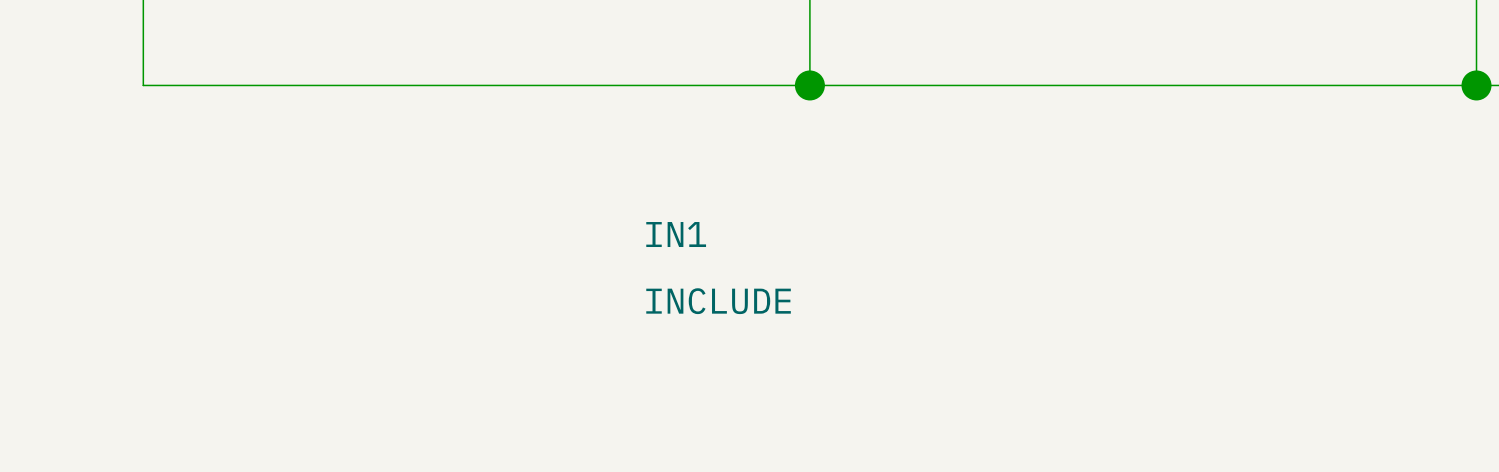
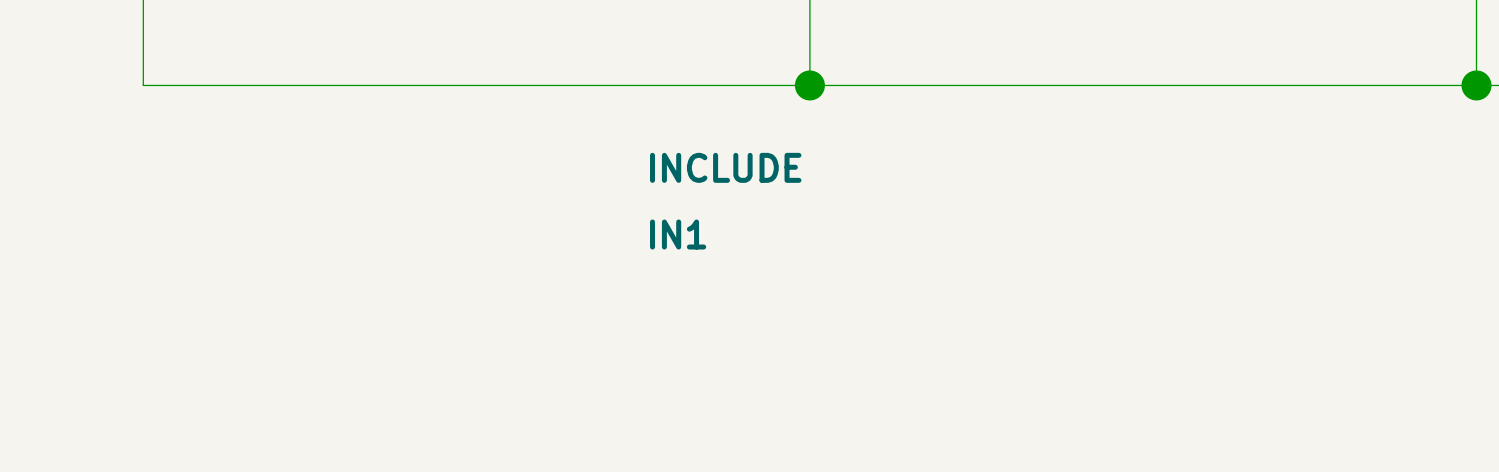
IN1 position: (718, 268) -> (725, 201)
IN1 value position: INCLUDE (718, 301) -> INCLUDE (725, 167)

